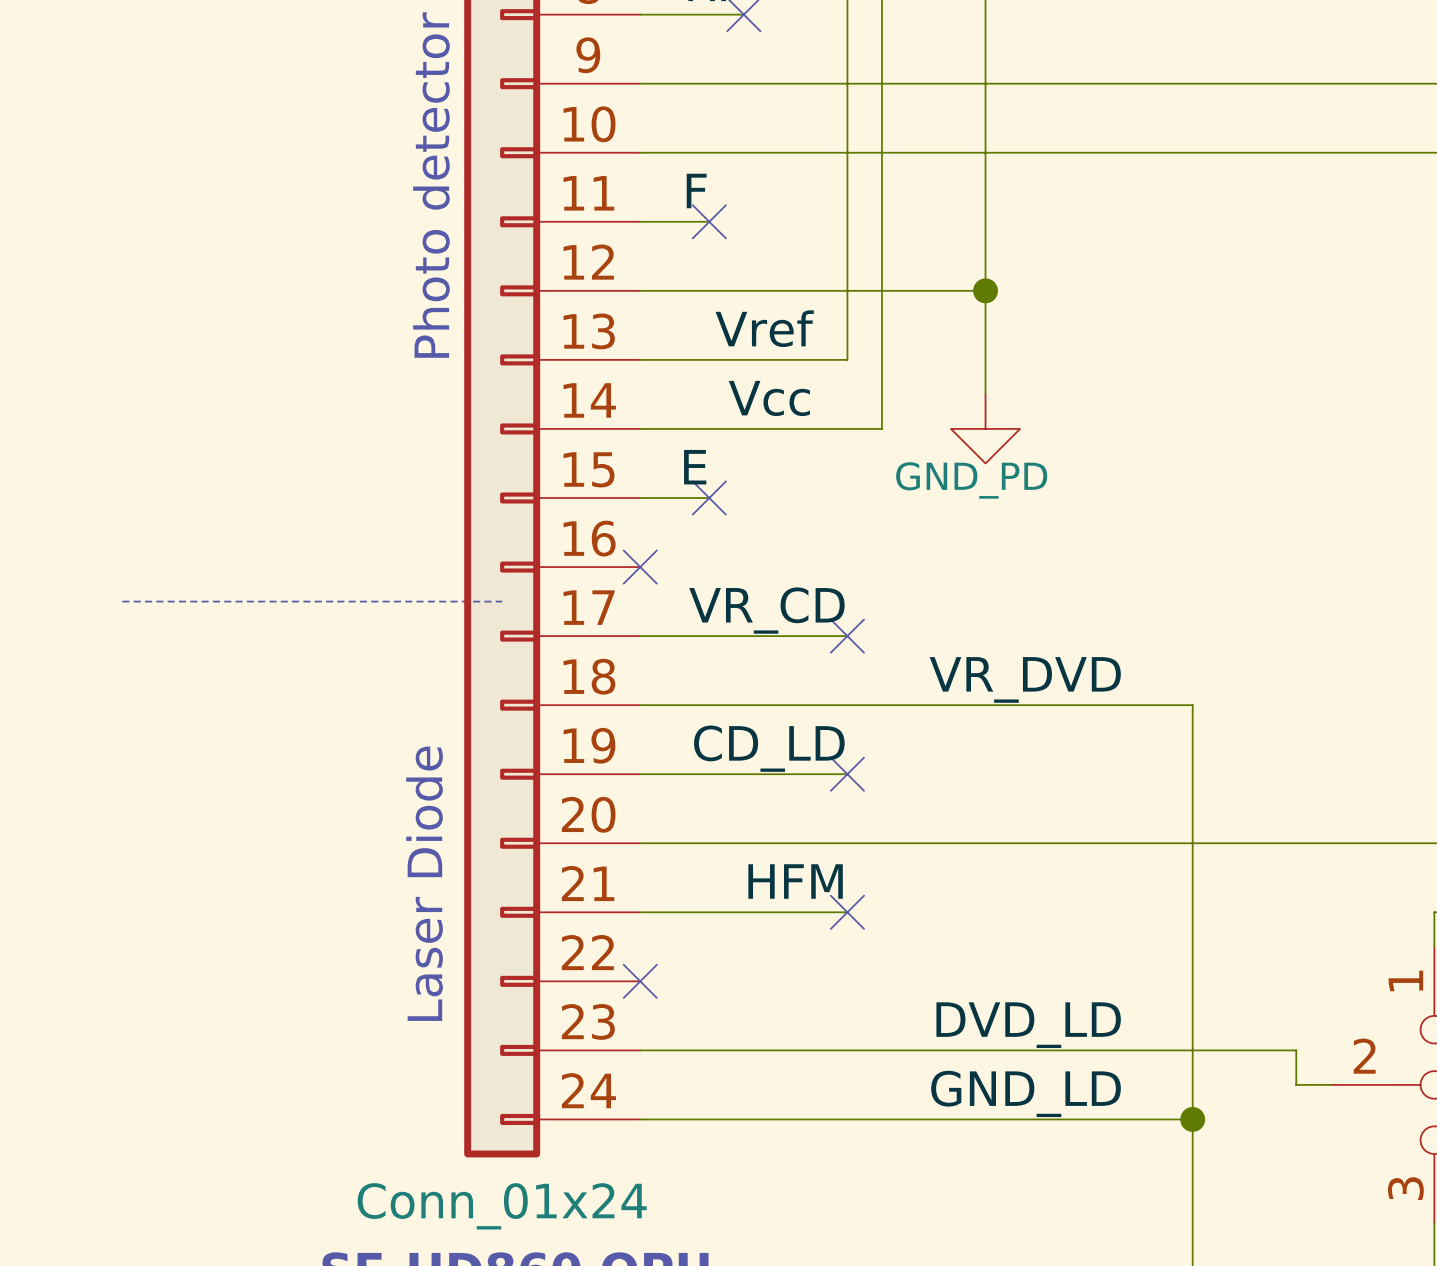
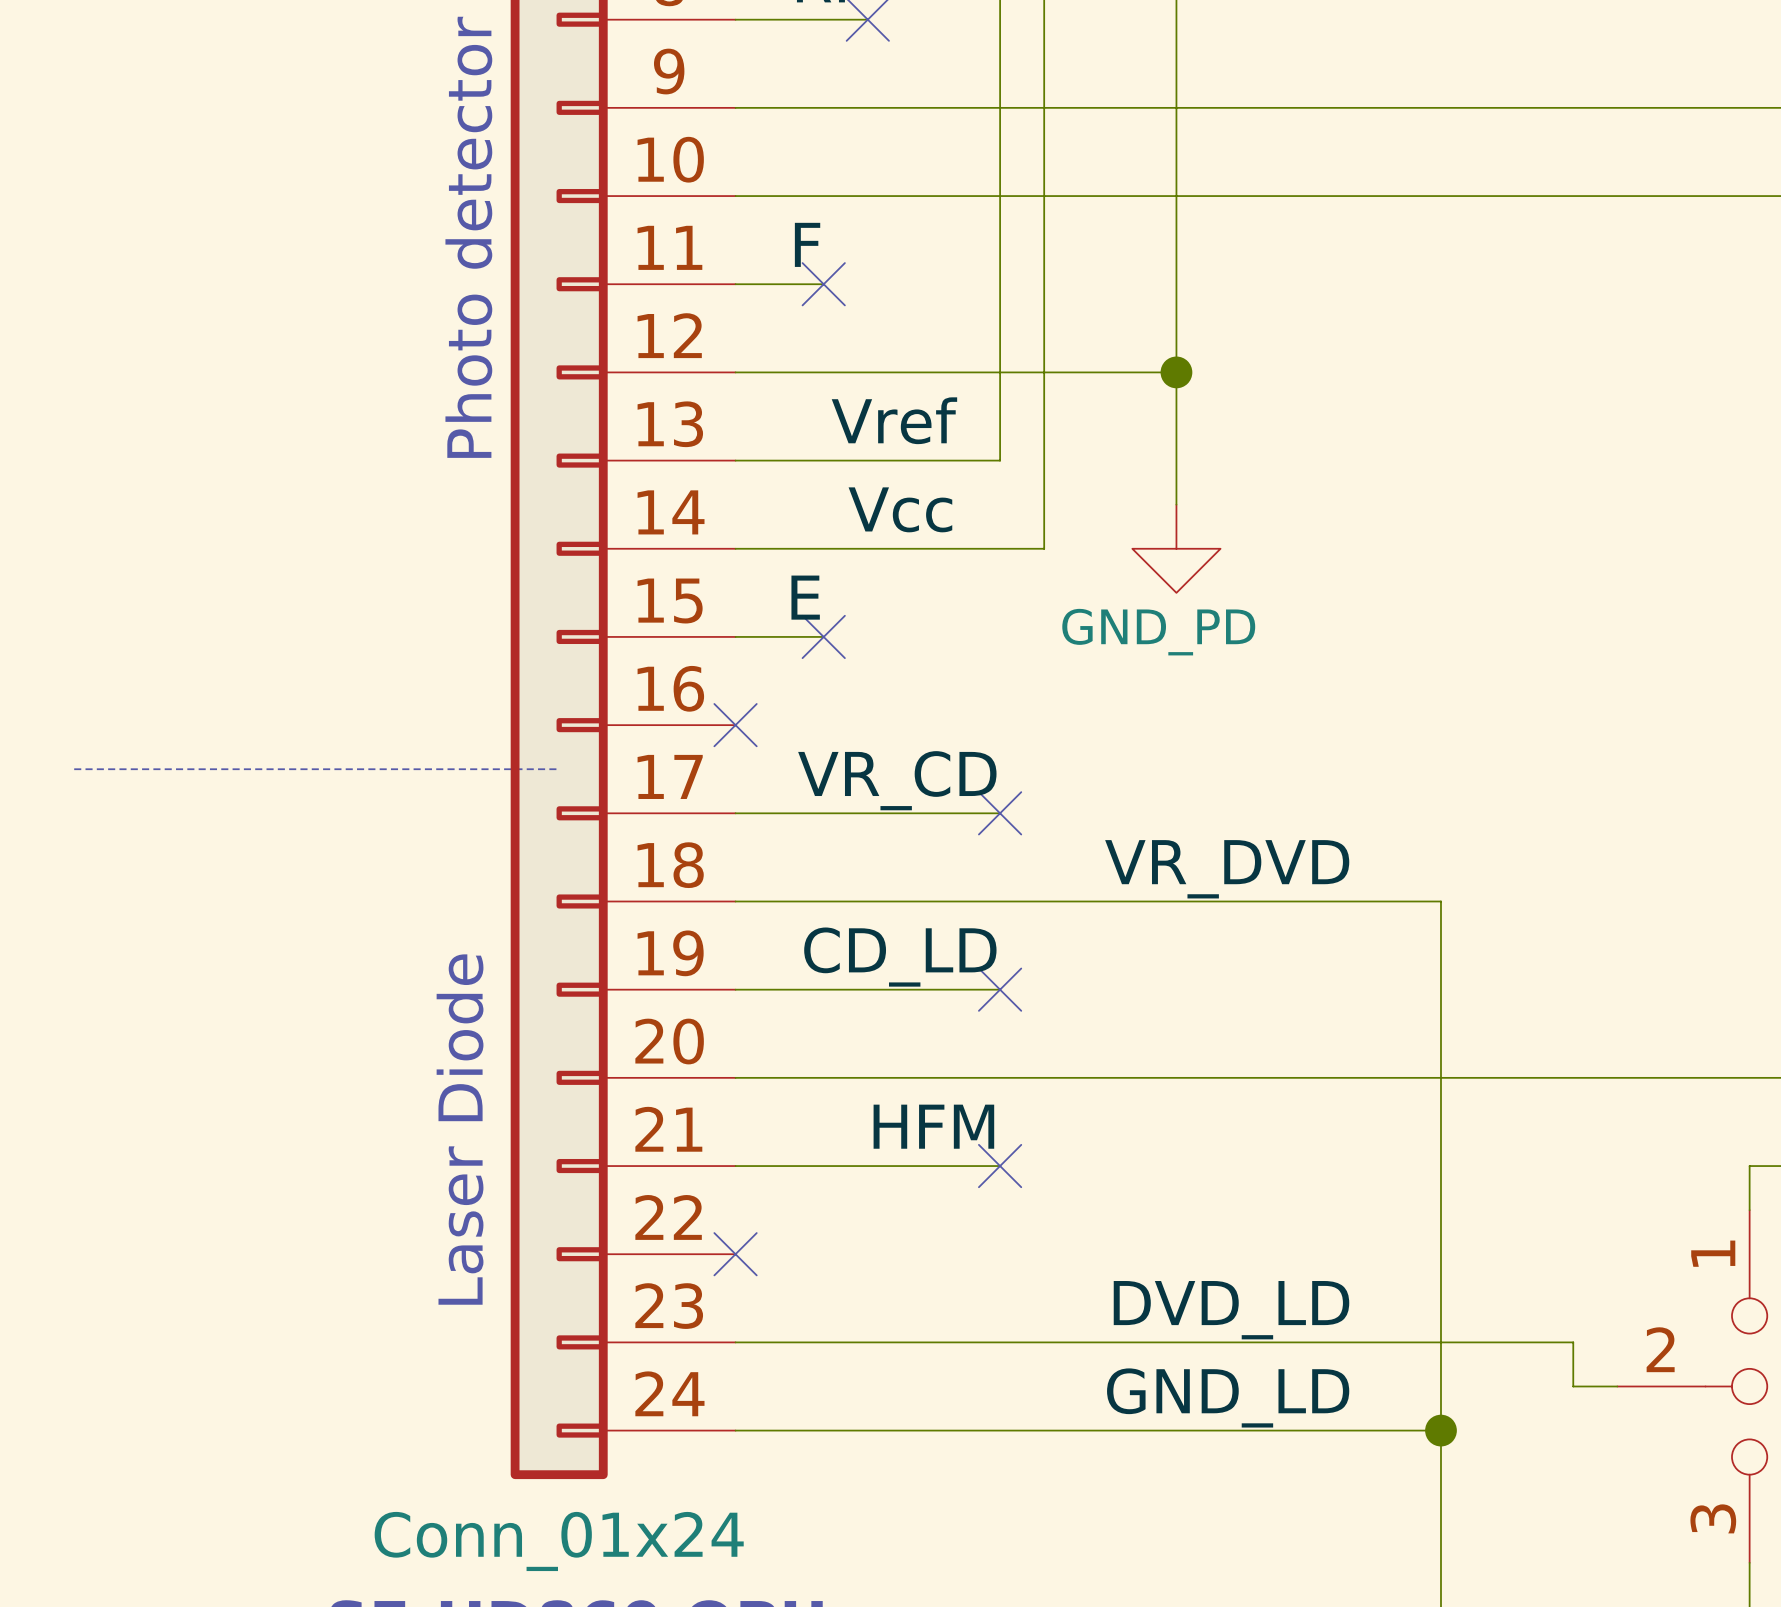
power symbol text position: GND_PD (971, 480) -> GND_PD (1158, 632)

